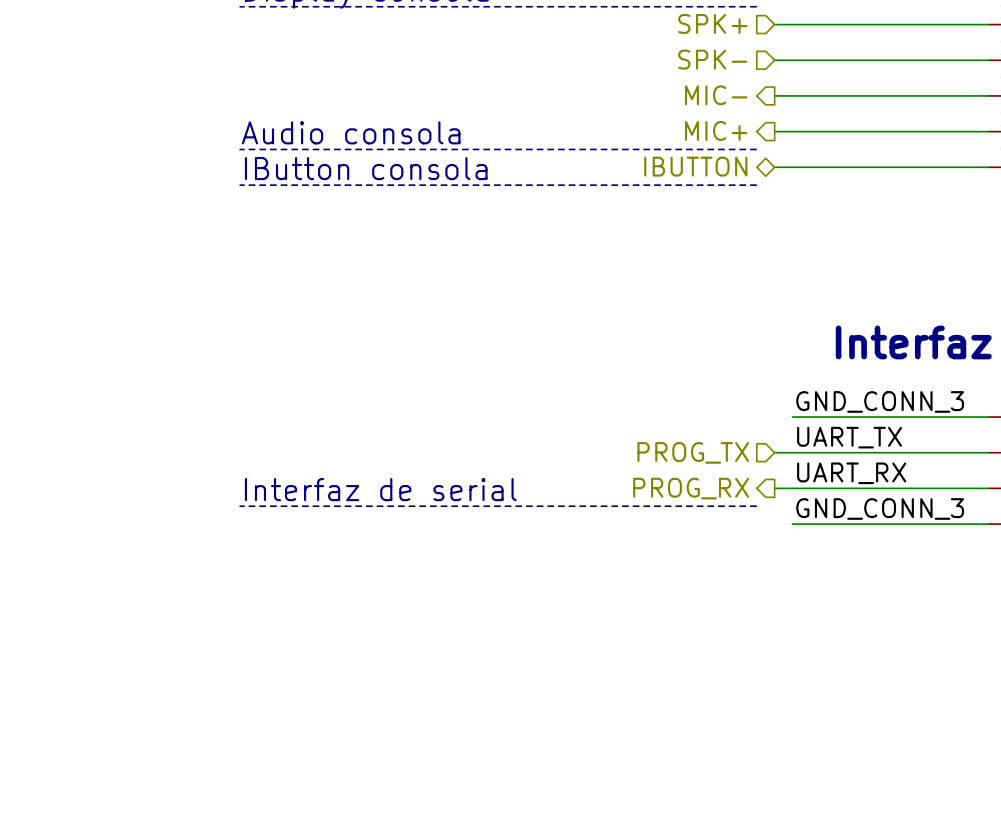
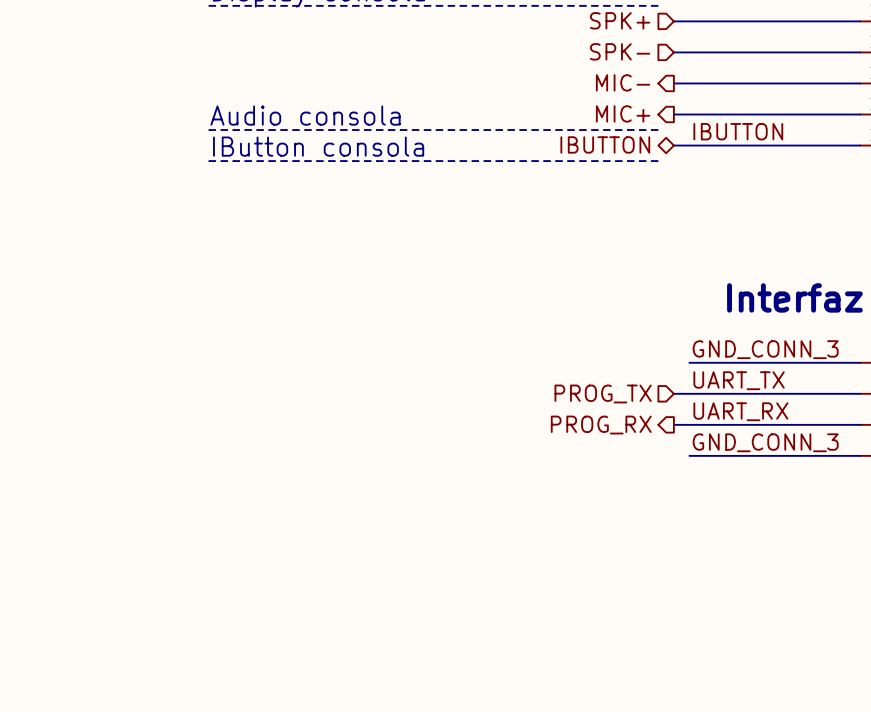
label: none -> IBUTTON (738, 131)
text: Interfaz de serial (380, 489) -> none
line: (239, 506) (756, 506) -> none

